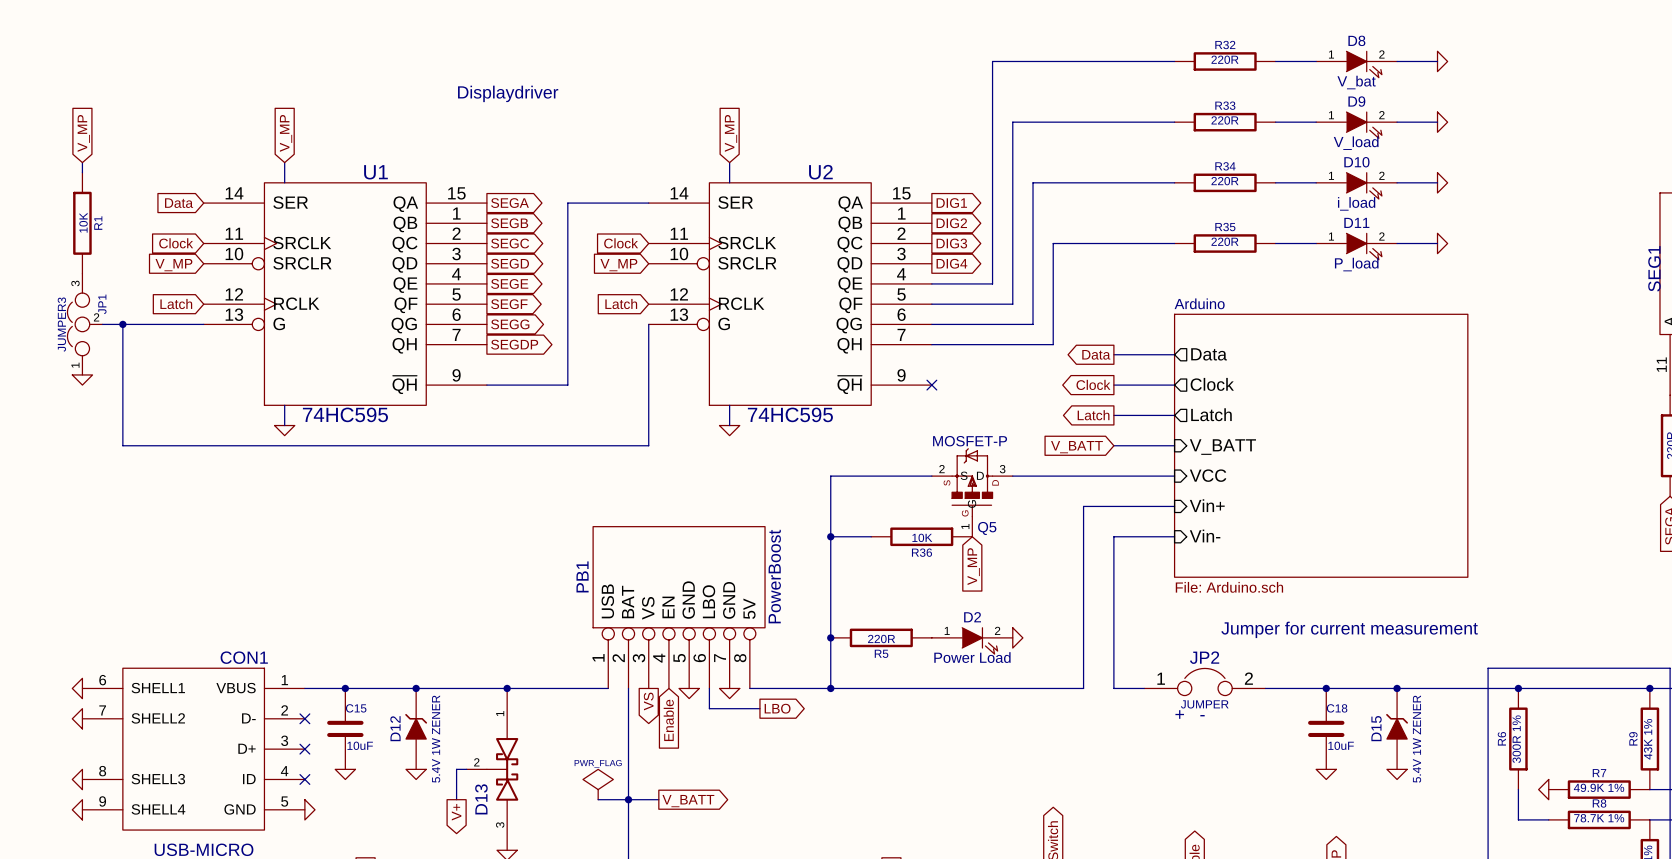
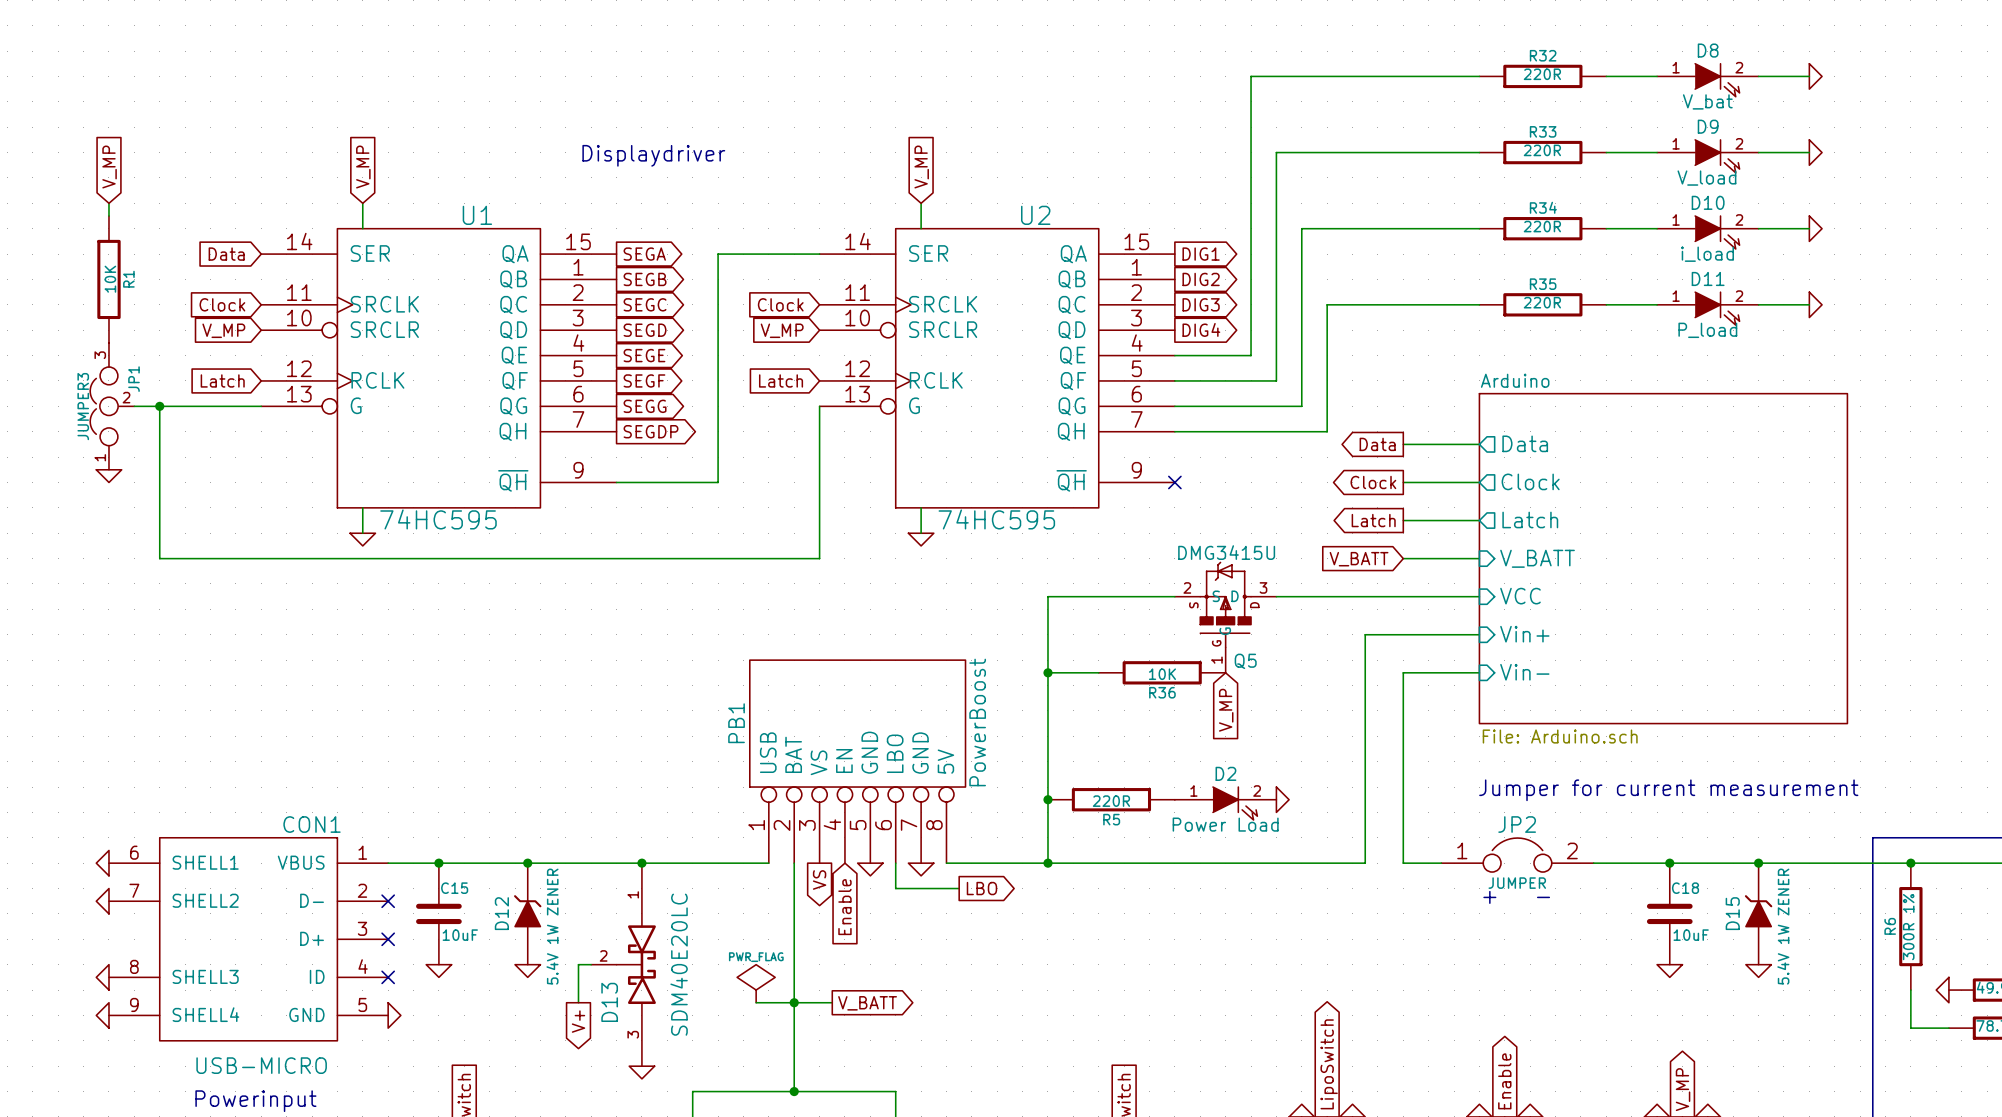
text position: Displaydriver (508, 93) -> Displaydriver (653, 155)
Q5 value: MOSFET-P (970, 441) -> DMG3415U (1226, 552)
D13 value: none -> SDM40E20LC (679, 964)

